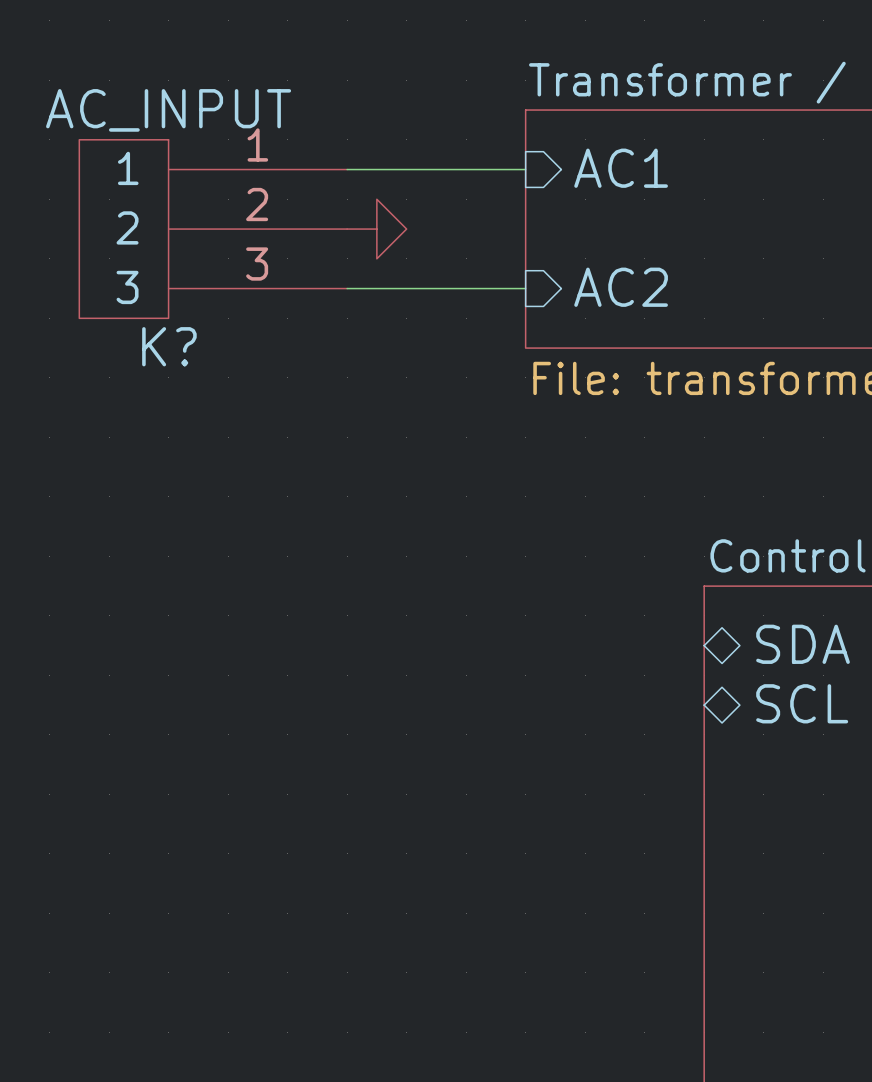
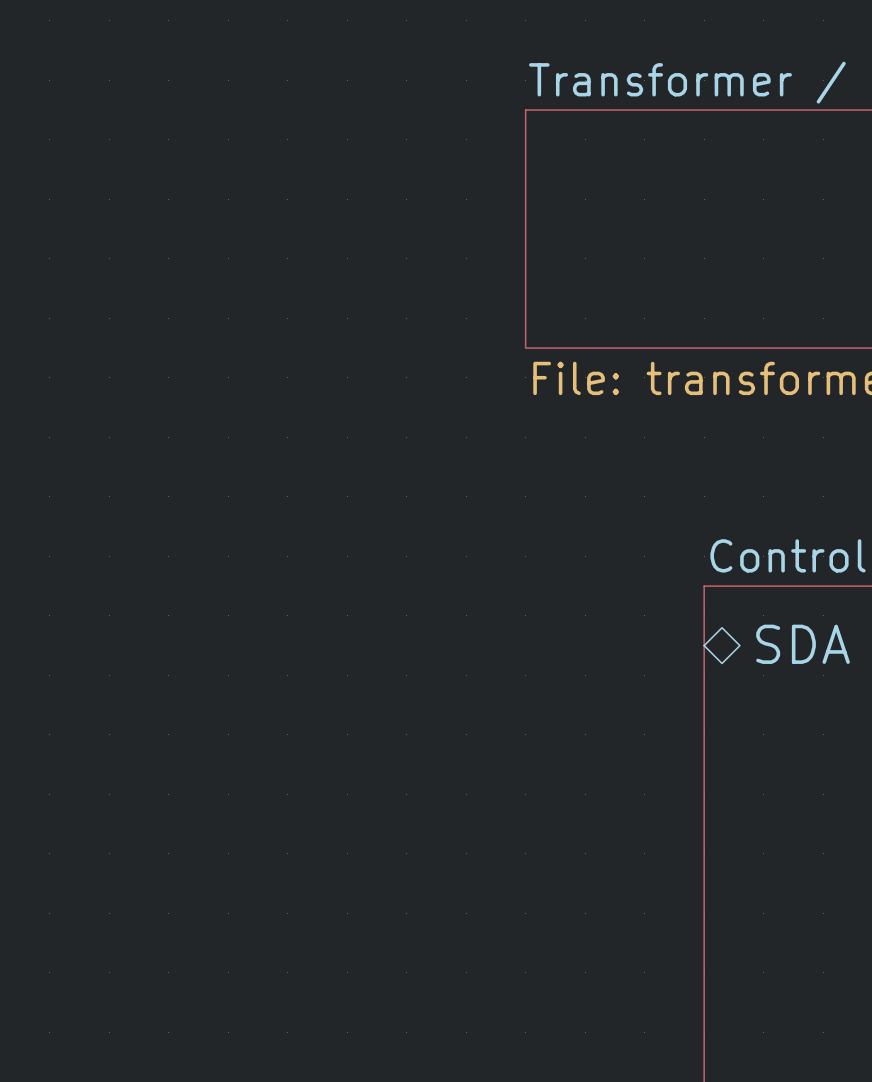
sheet pin: AC1 (621, 168) -> none
wire: (347, 169) (525, 169) -> none
K?: AC_INPUT (213, 229) -> none
power symbol: (376, 229) -> none
sheet pin: AC2 (621, 287) -> none
wire: (347, 288) (525, 288) -> none
sheet pin: SCL (802, 703) -> none

